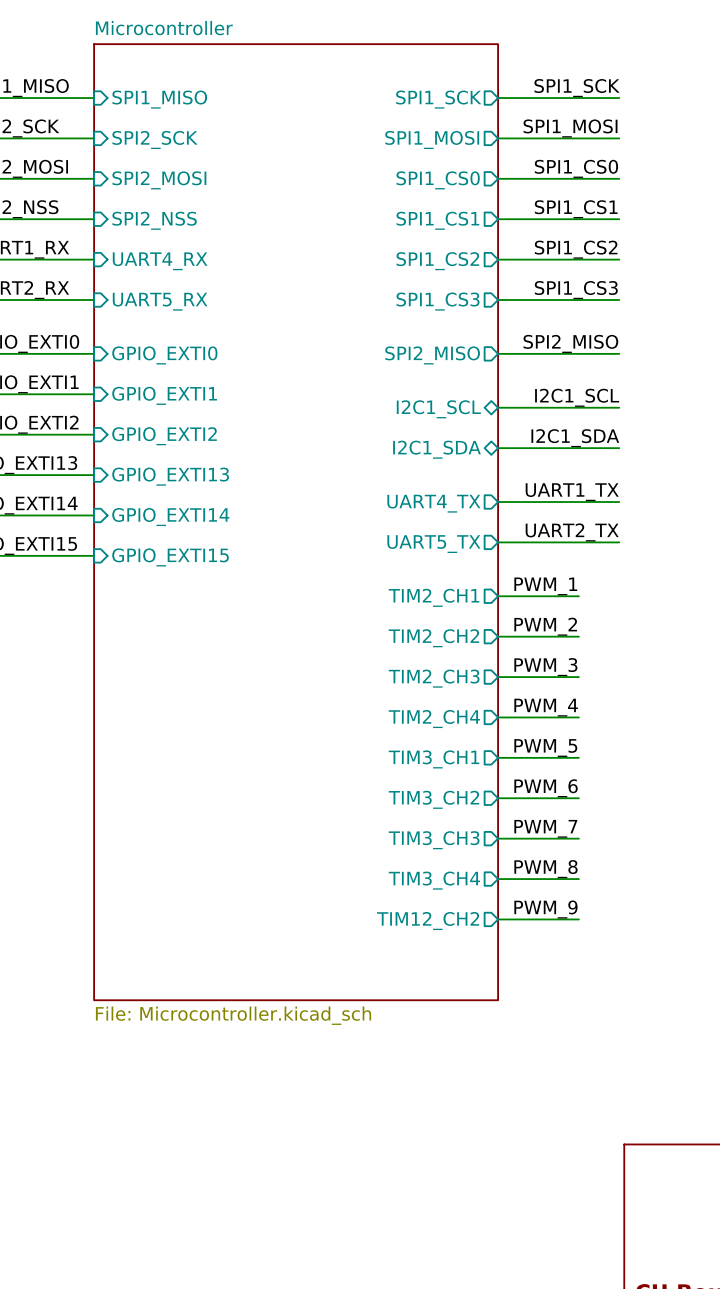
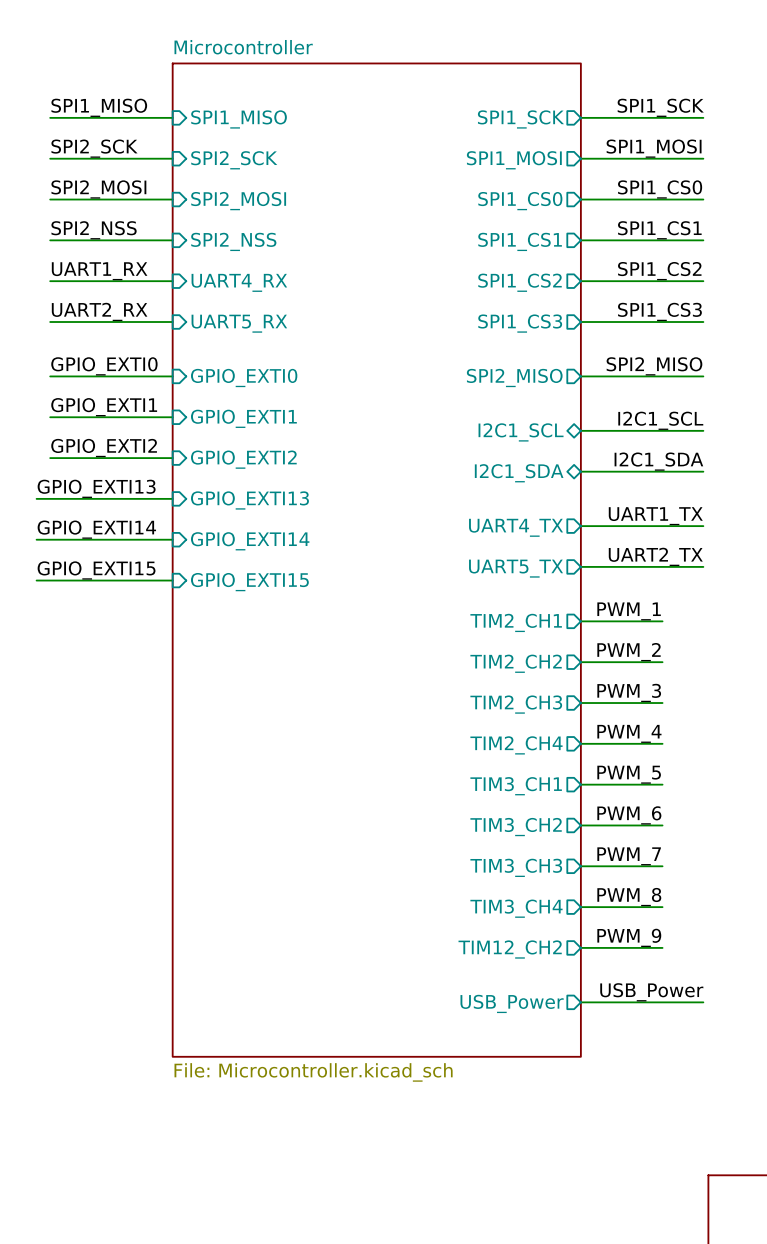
sheet Microcontroller: File: Microcontroller.kicad_sch (296, 522) -> none
sheet Microcontroller: none -> File: Microcontroller.kicad_sch (376, 560)
label: none -> USB_Power (651, 992)
wire: none -> (580, 1002) (703, 1002)
sheet pin: none -> USB_Power (512, 1003)

